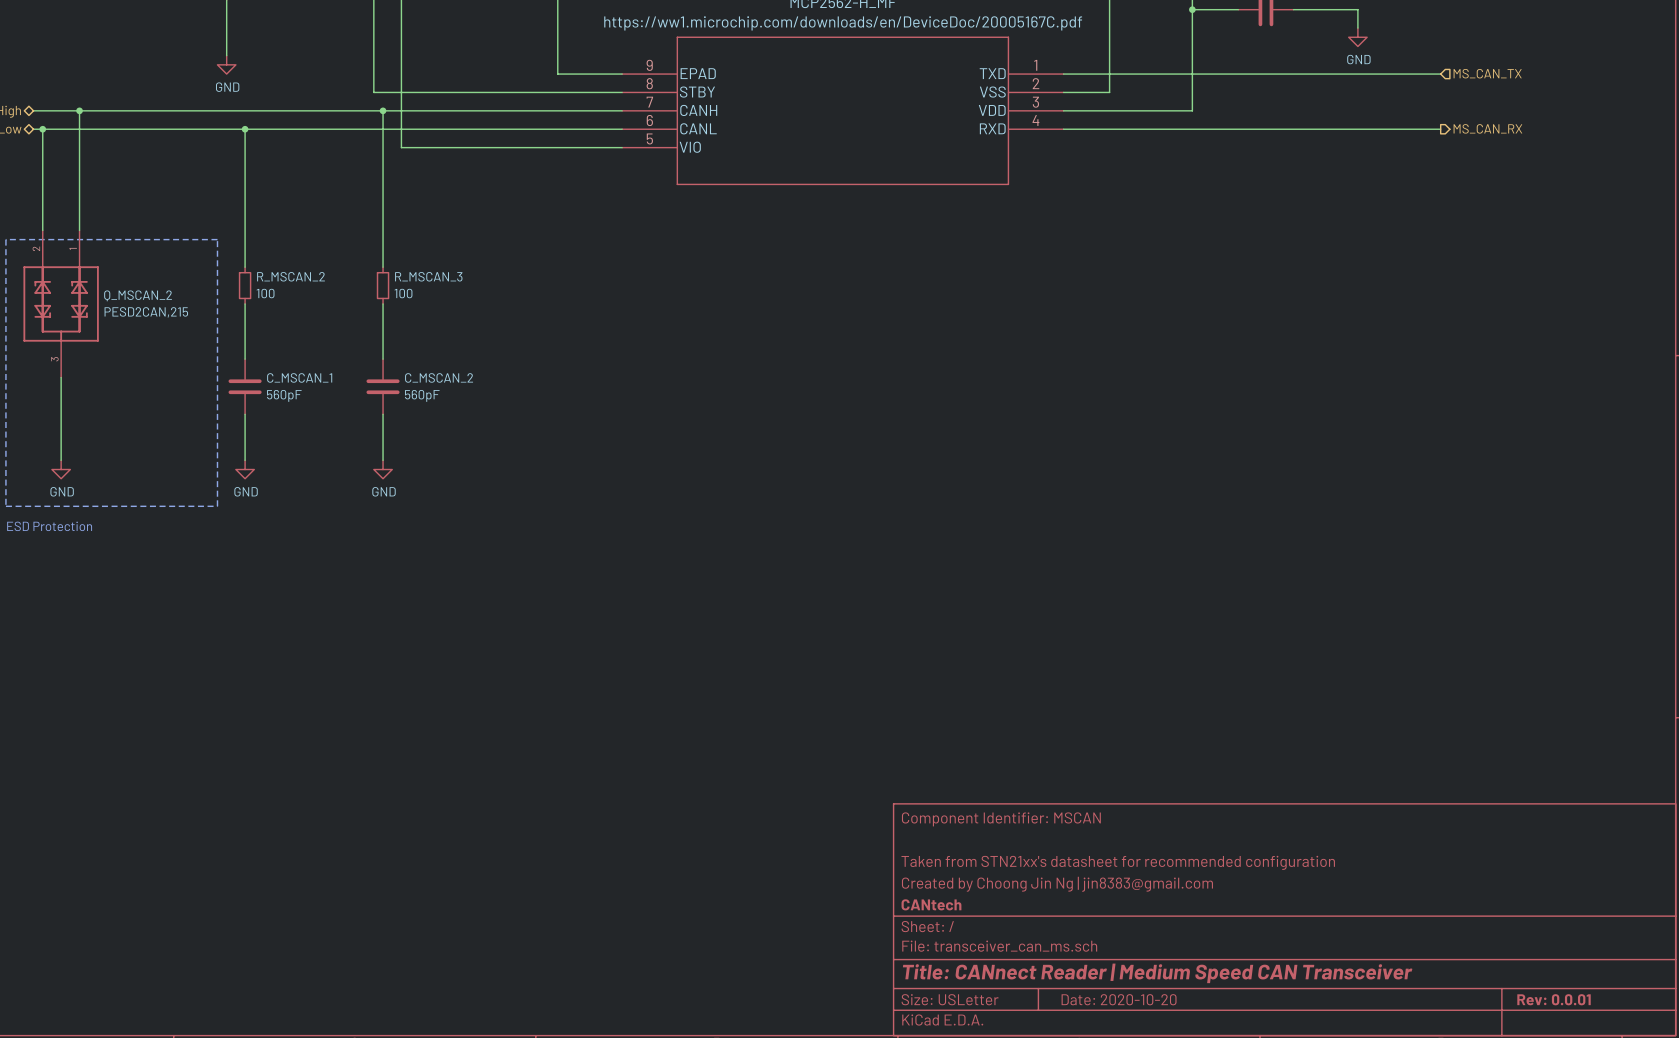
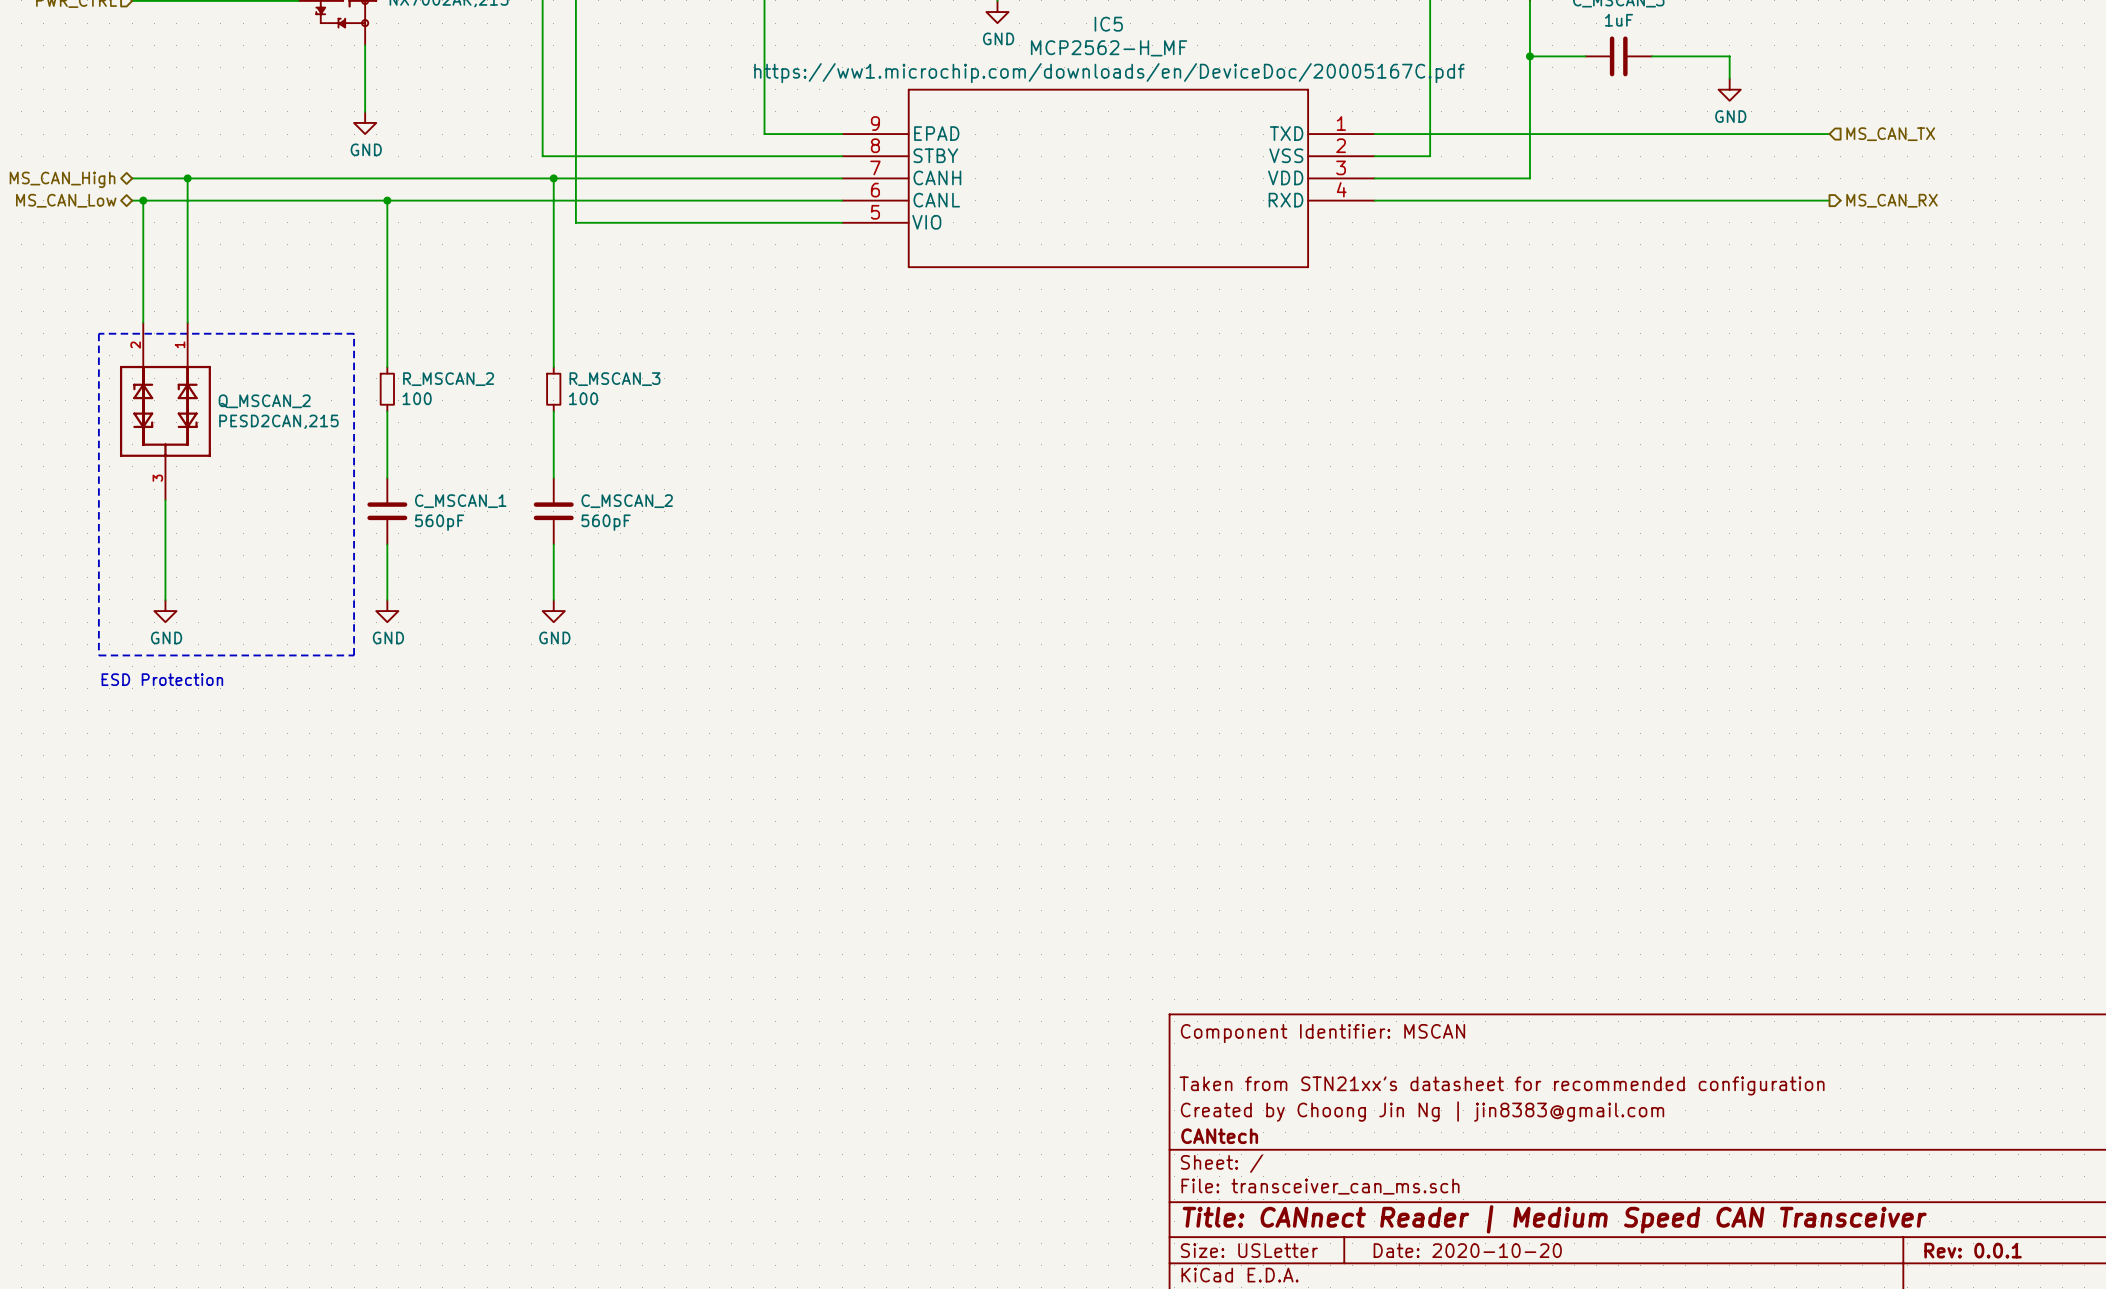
title block: Rev: 0.0.01 (1554, 999) -> Rev: 0.0.1 (1973, 1250)

